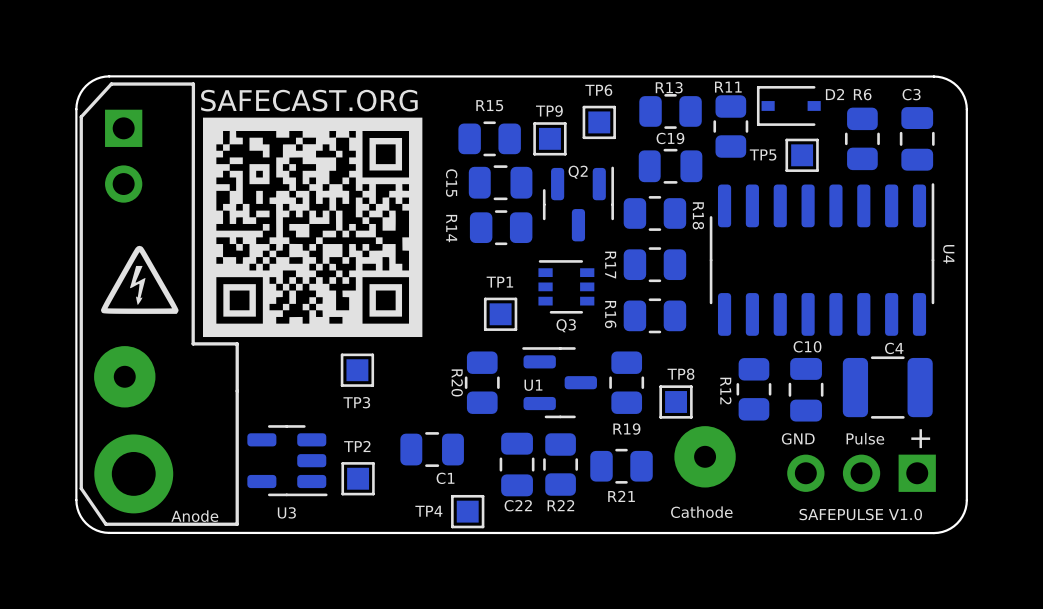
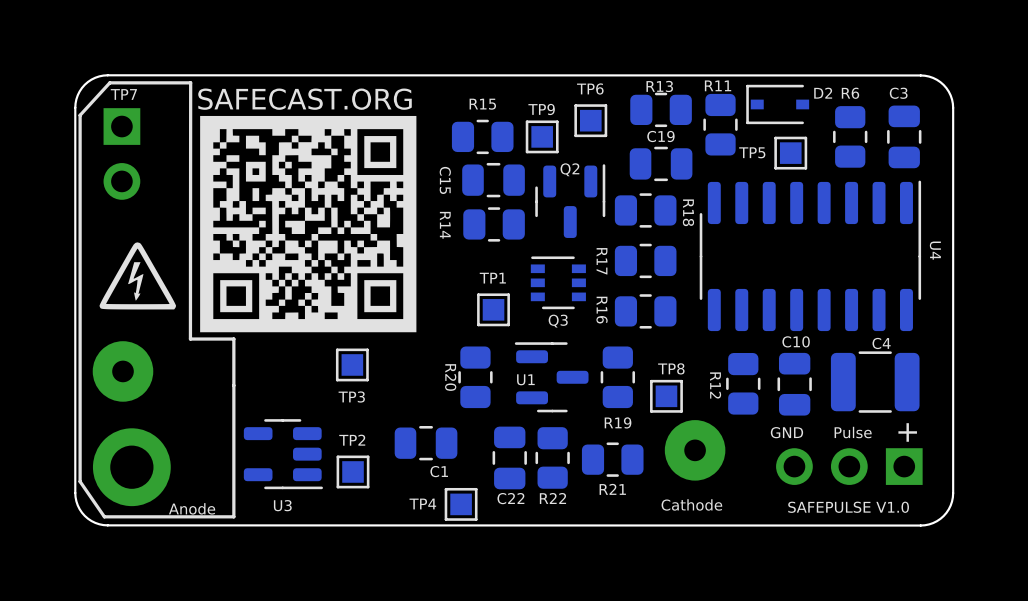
text: none -> TP7 (123, 94)

